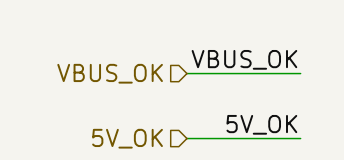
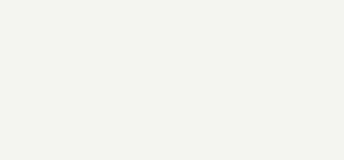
label: VBUS_OK (244, 59) -> none
hierarchical label: VBUS_OK (110, 73) -> none
wire: (186, 73) (300, 73) -> none
label: 5V_OK (261, 124) -> none
hierarchical label: 5V_OK (127, 138) -> none
wire: (186, 138) (300, 138) -> none

